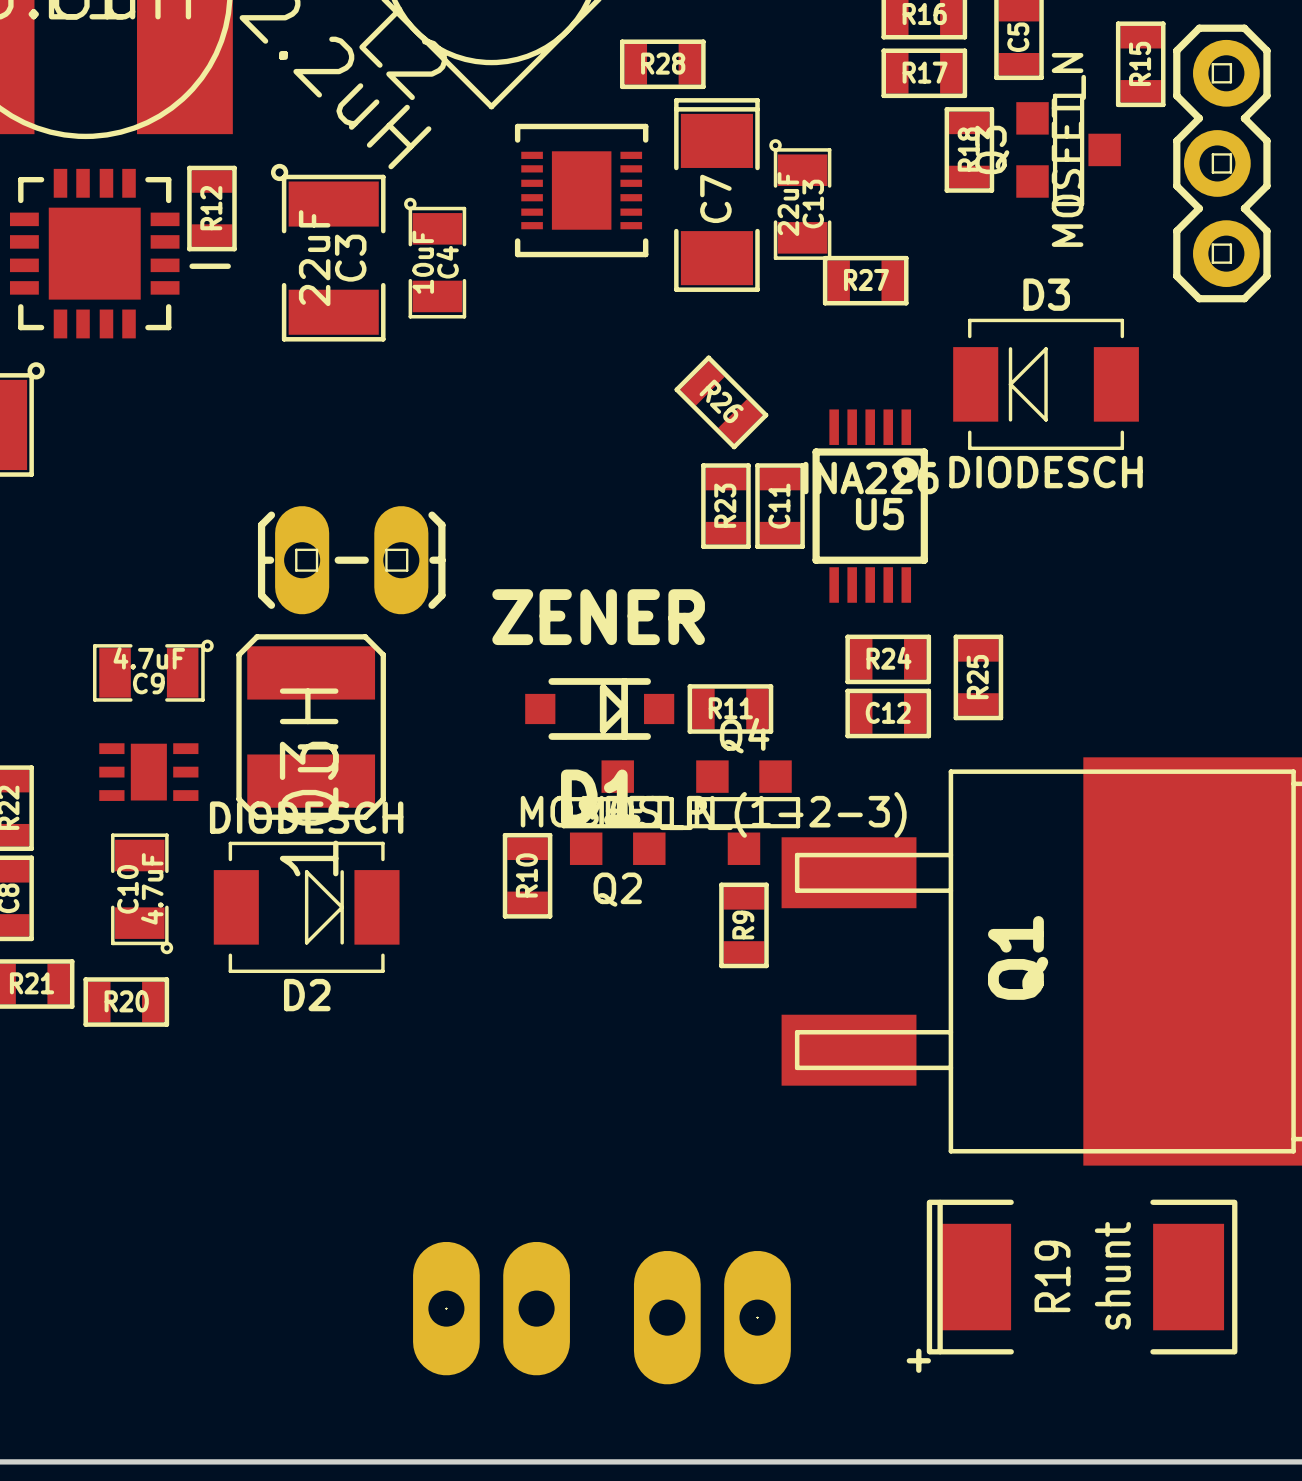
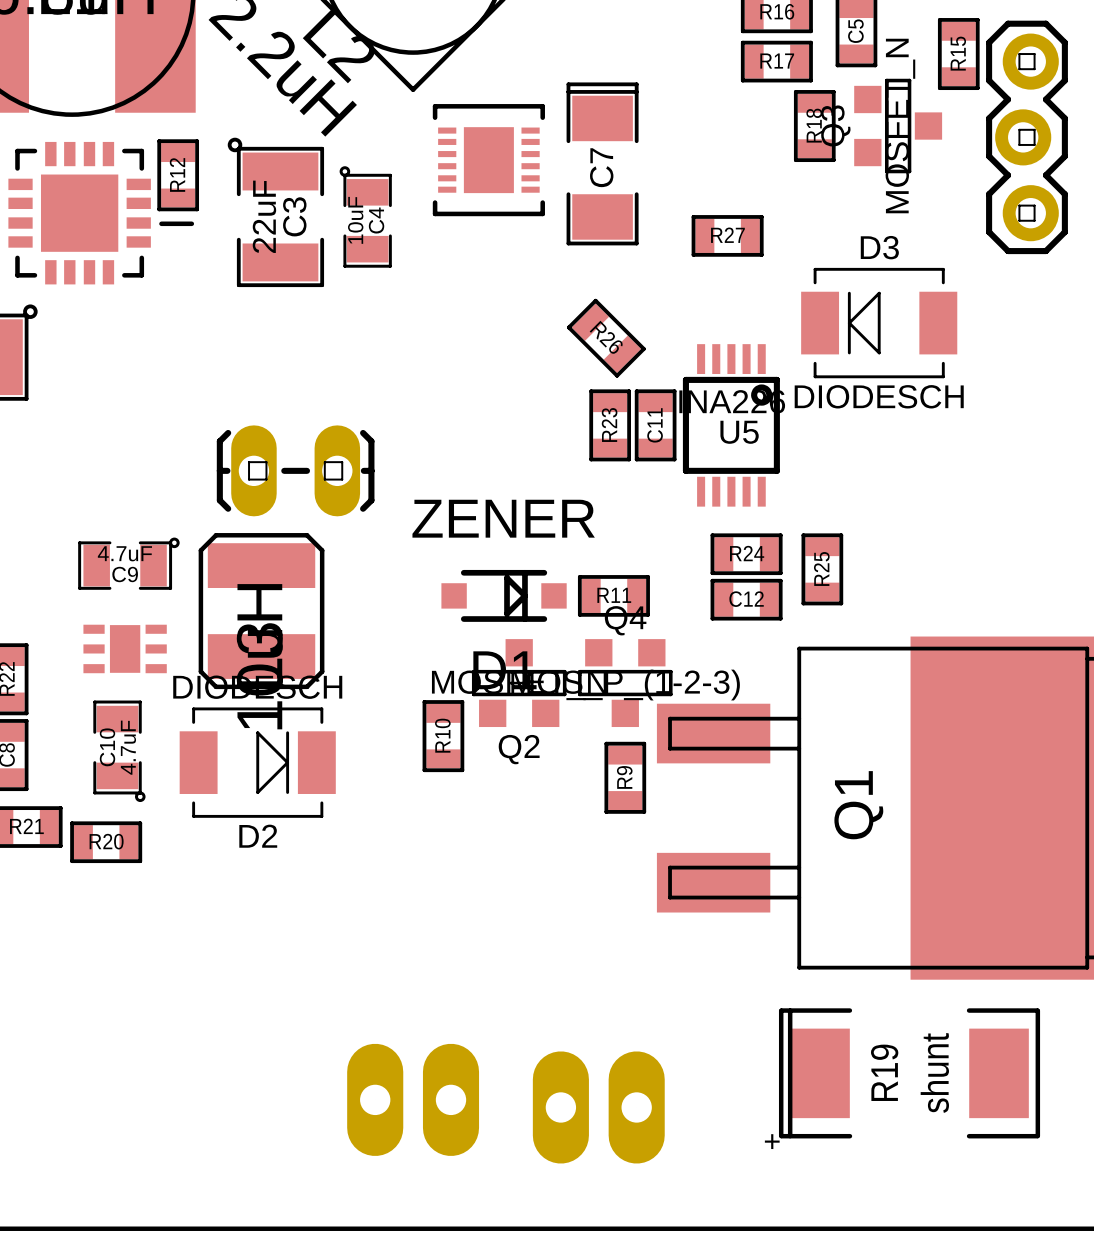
R28: (662, 64) -> none
C13: 22uF (800, 199) -> none

